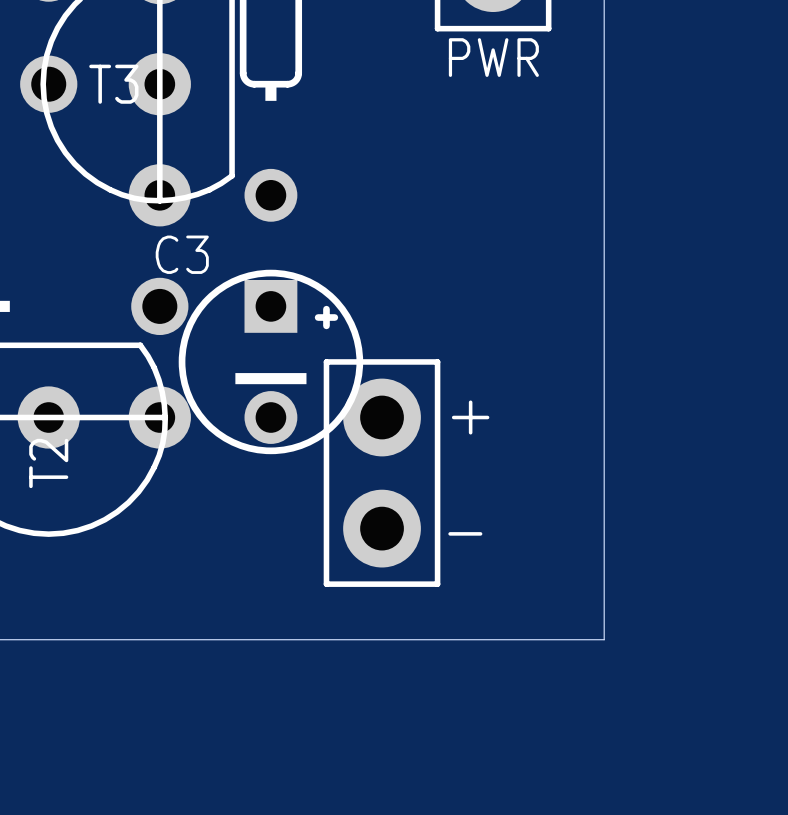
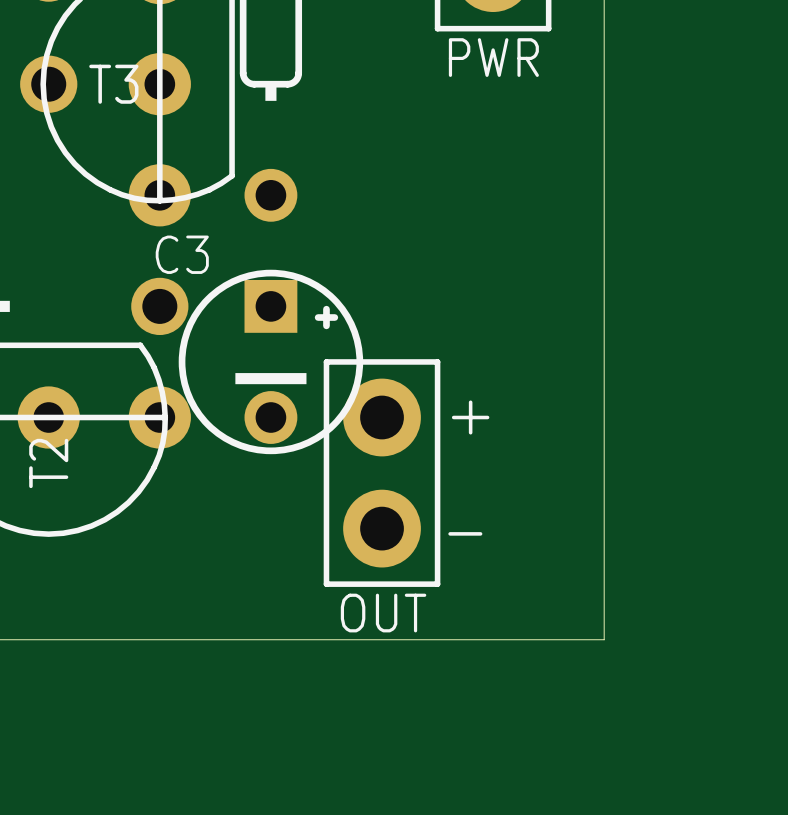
OUT name: none -> OUT (383, 613)

